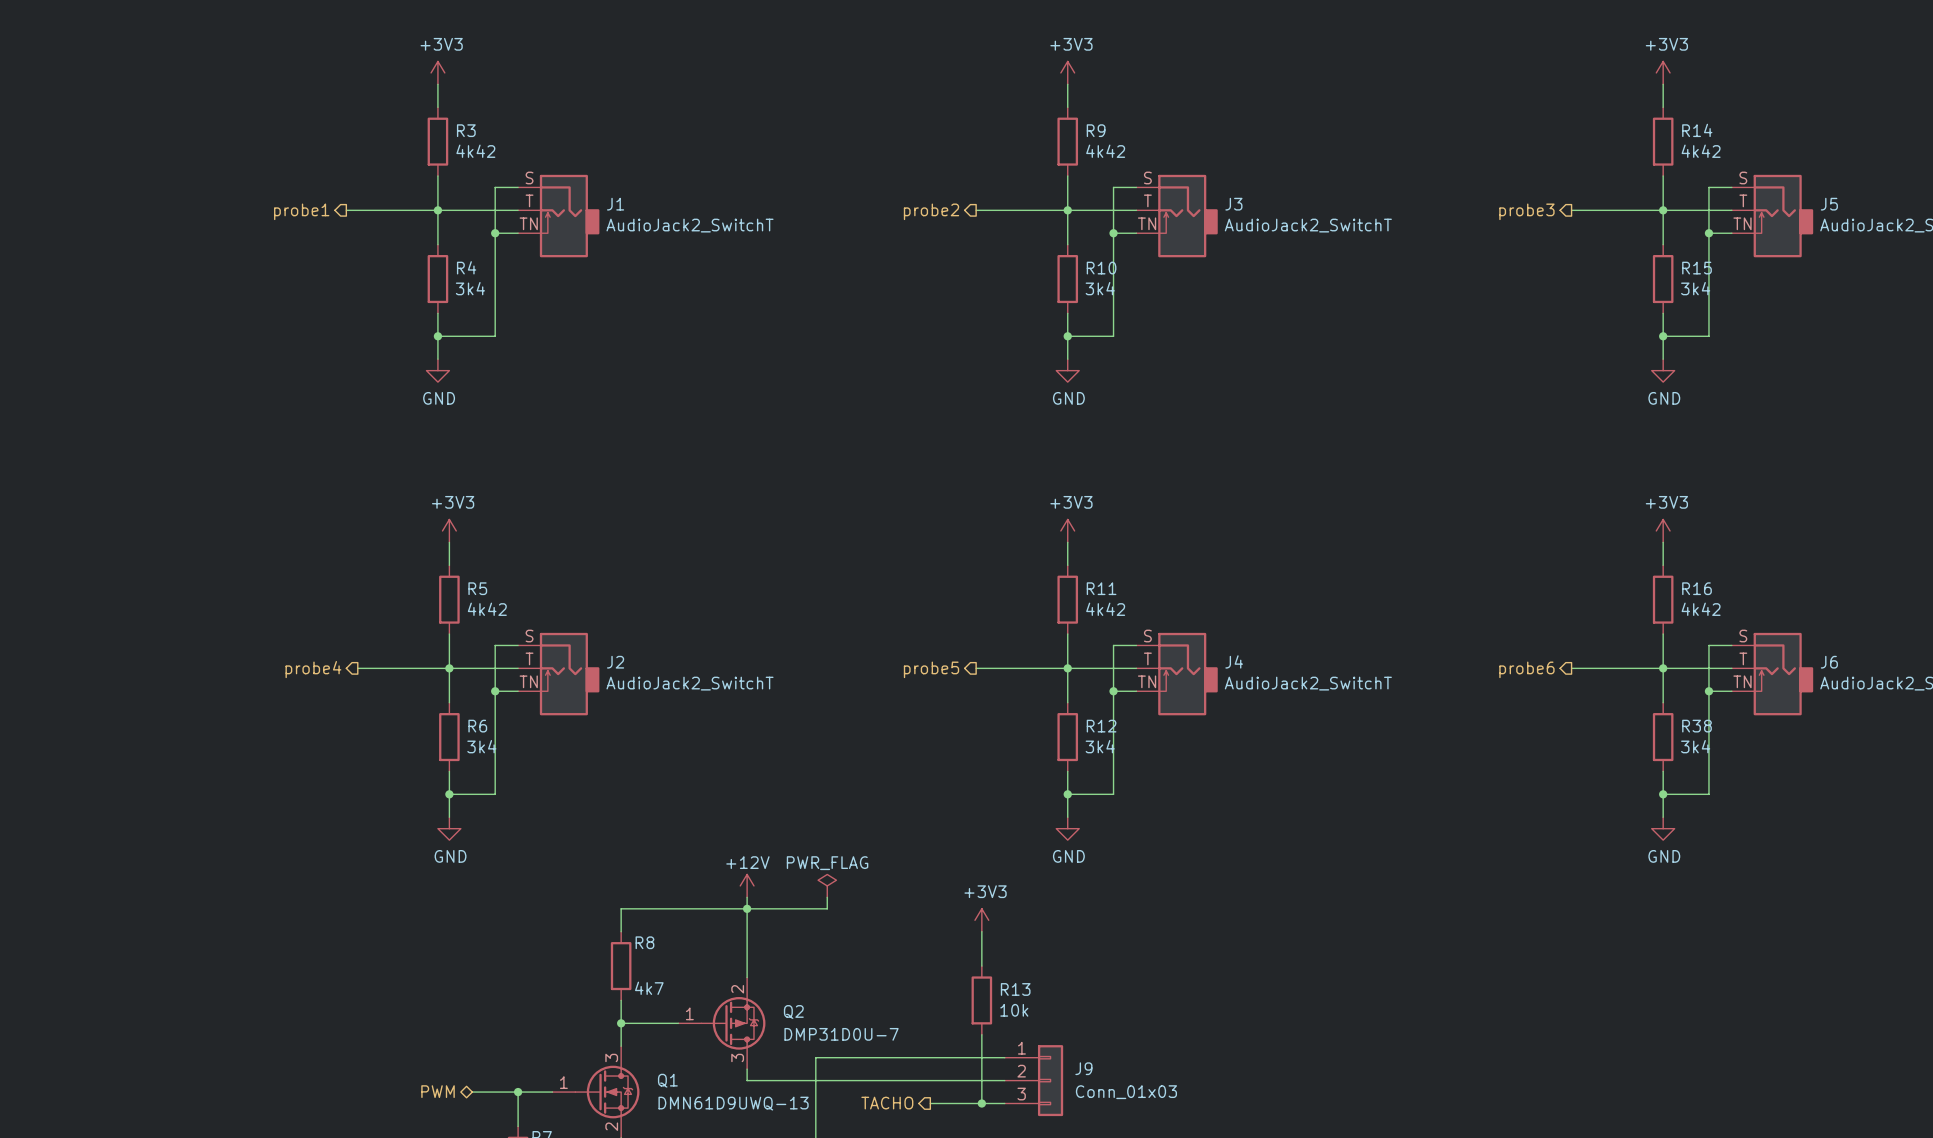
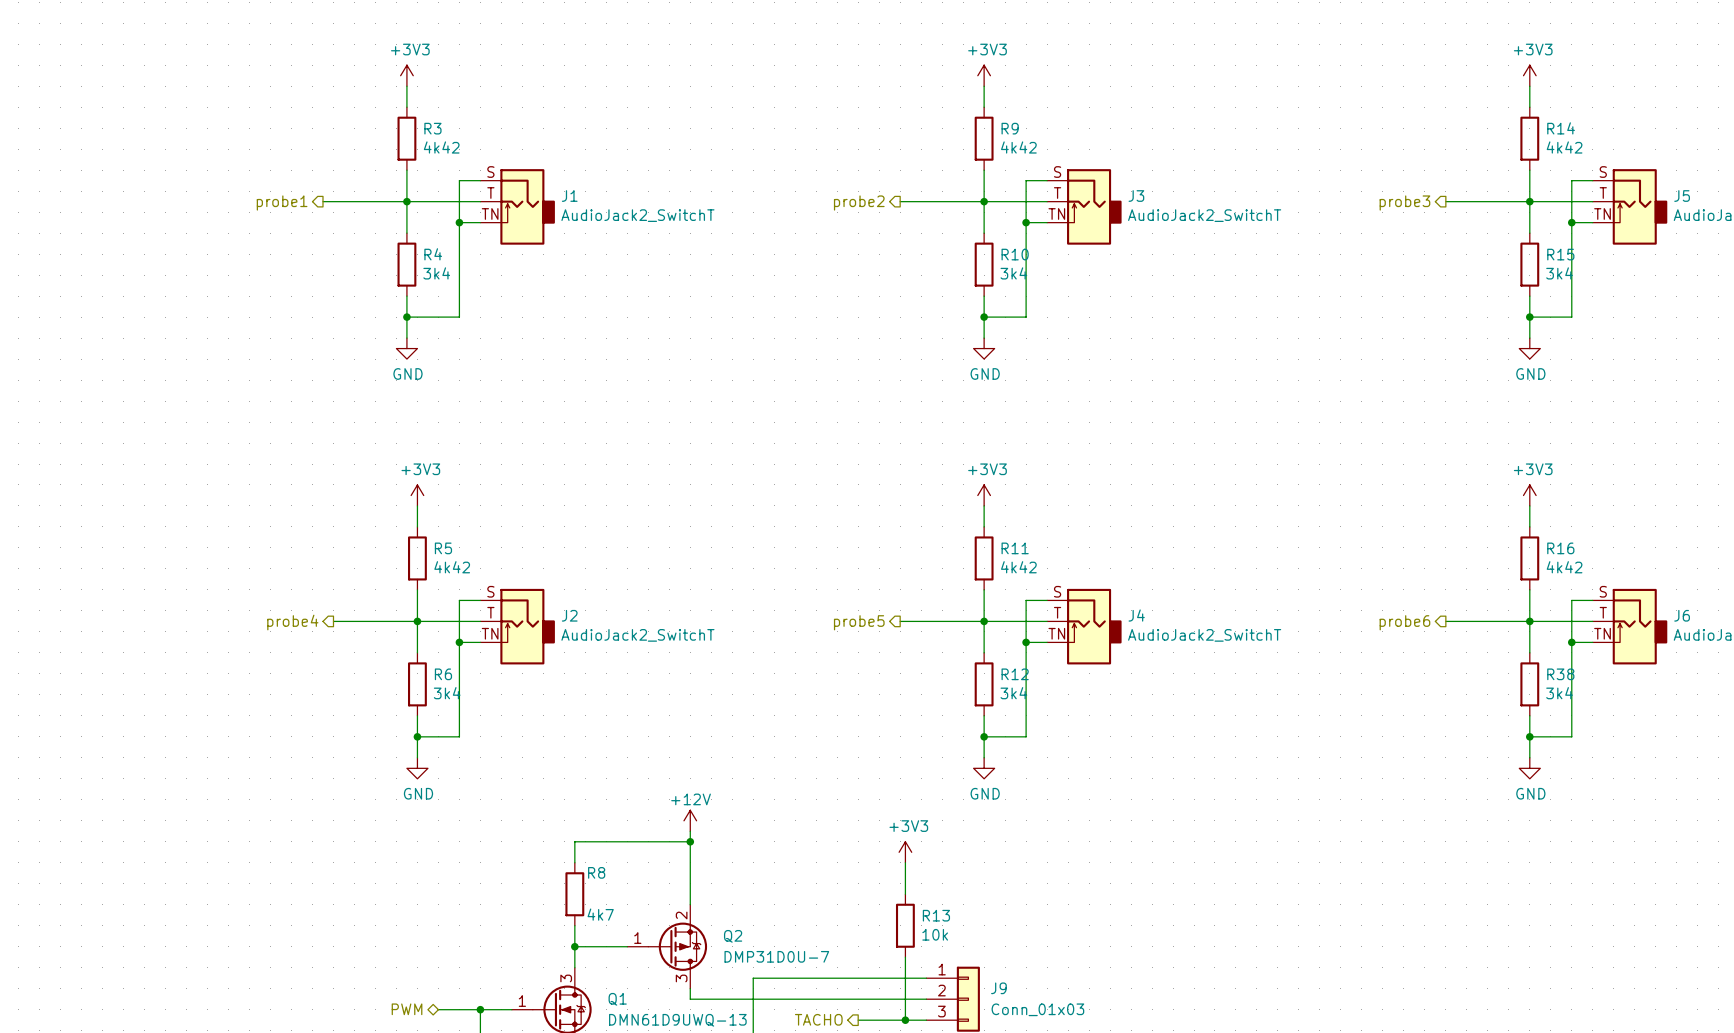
power symbol: PWR_FLAG (827, 885) -> none
wire: (827, 897) (827, 908) (747, 908) -> none

